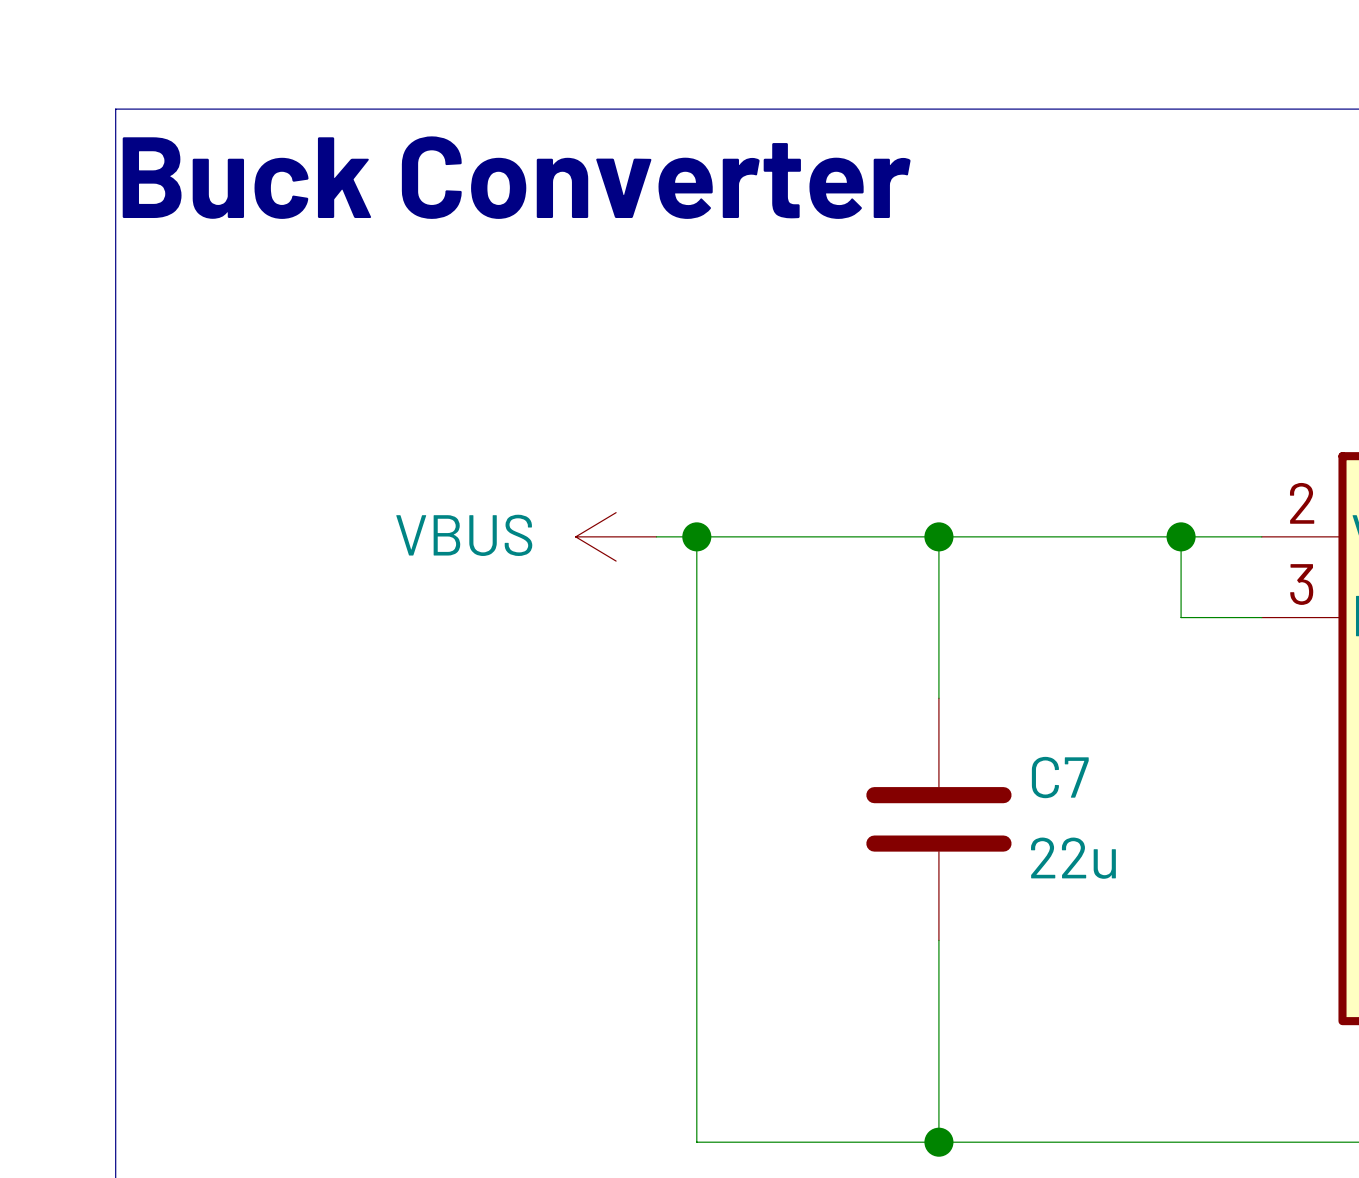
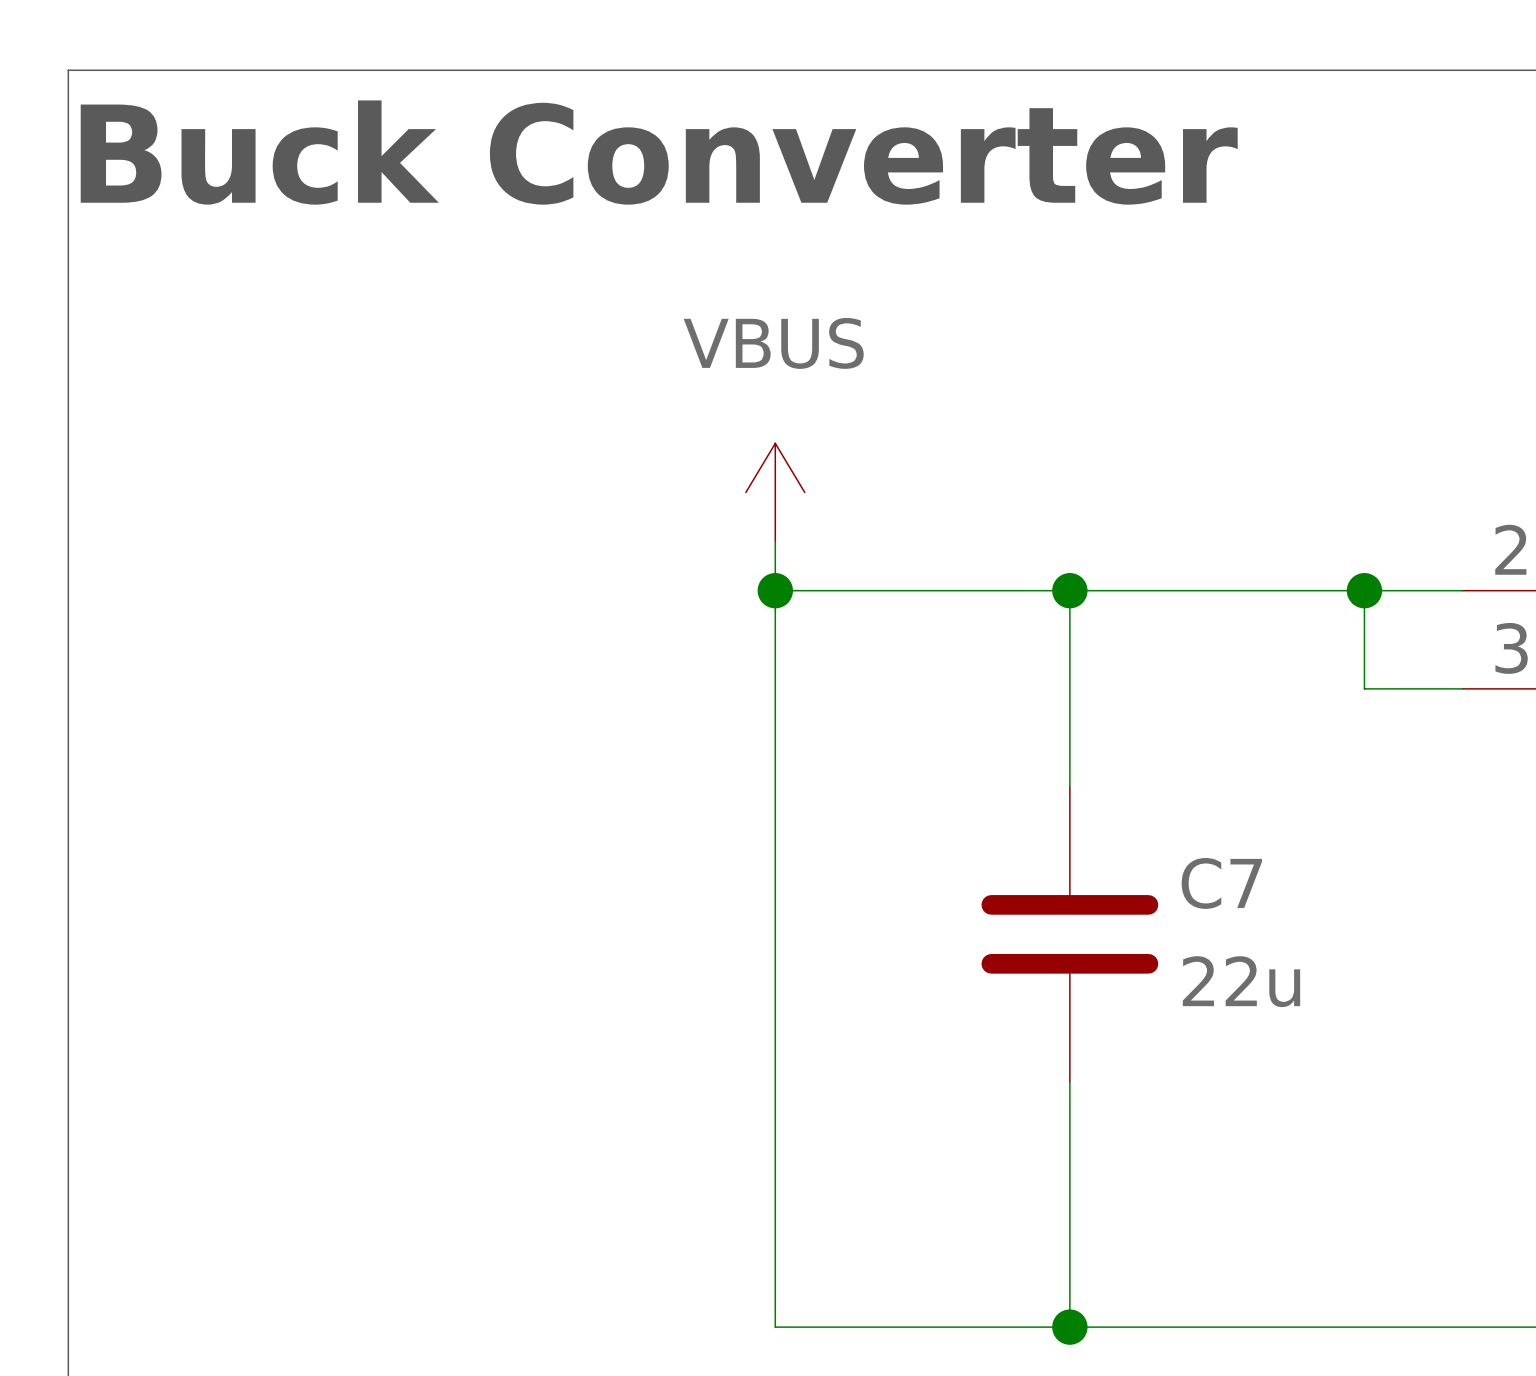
power symbol rotation: 0° (616, 536) -> 90° clockwise (775, 492)
power symbol position: VBUS (616, 536) -> VBUS (775, 492)
wire: (656, 536) (696, 536) -> (775, 541) (775, 590)

